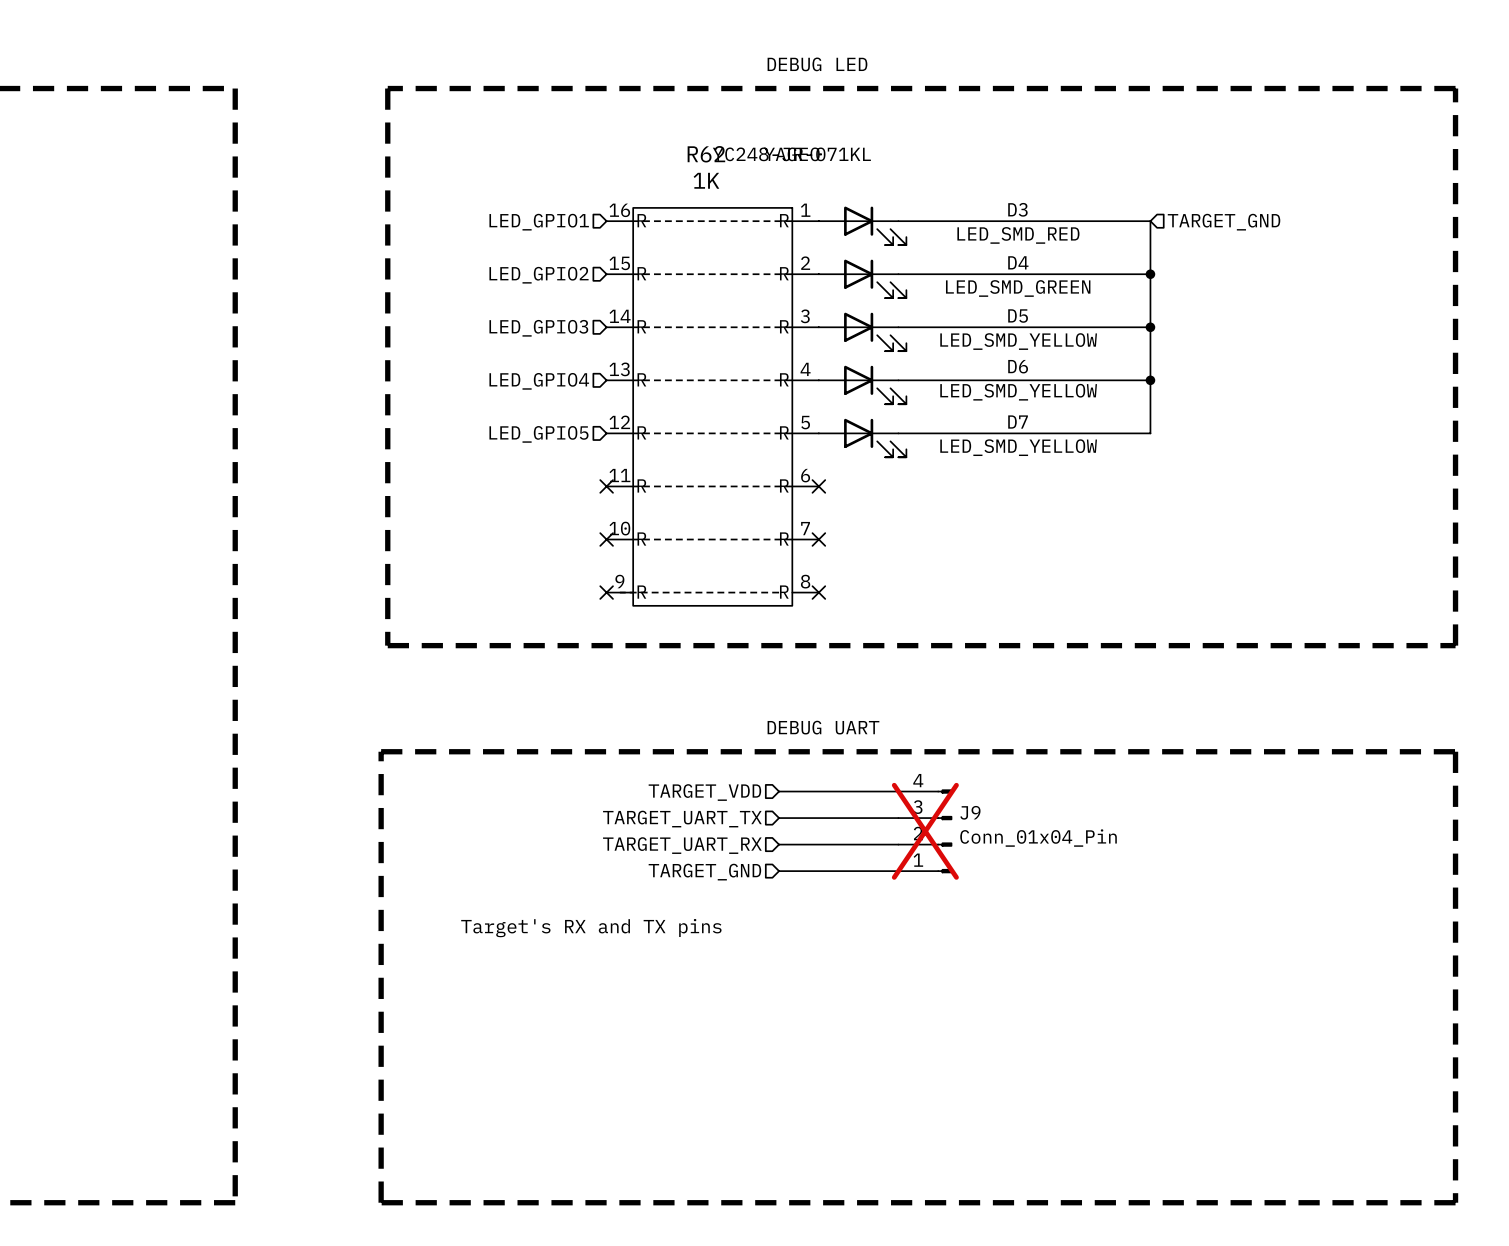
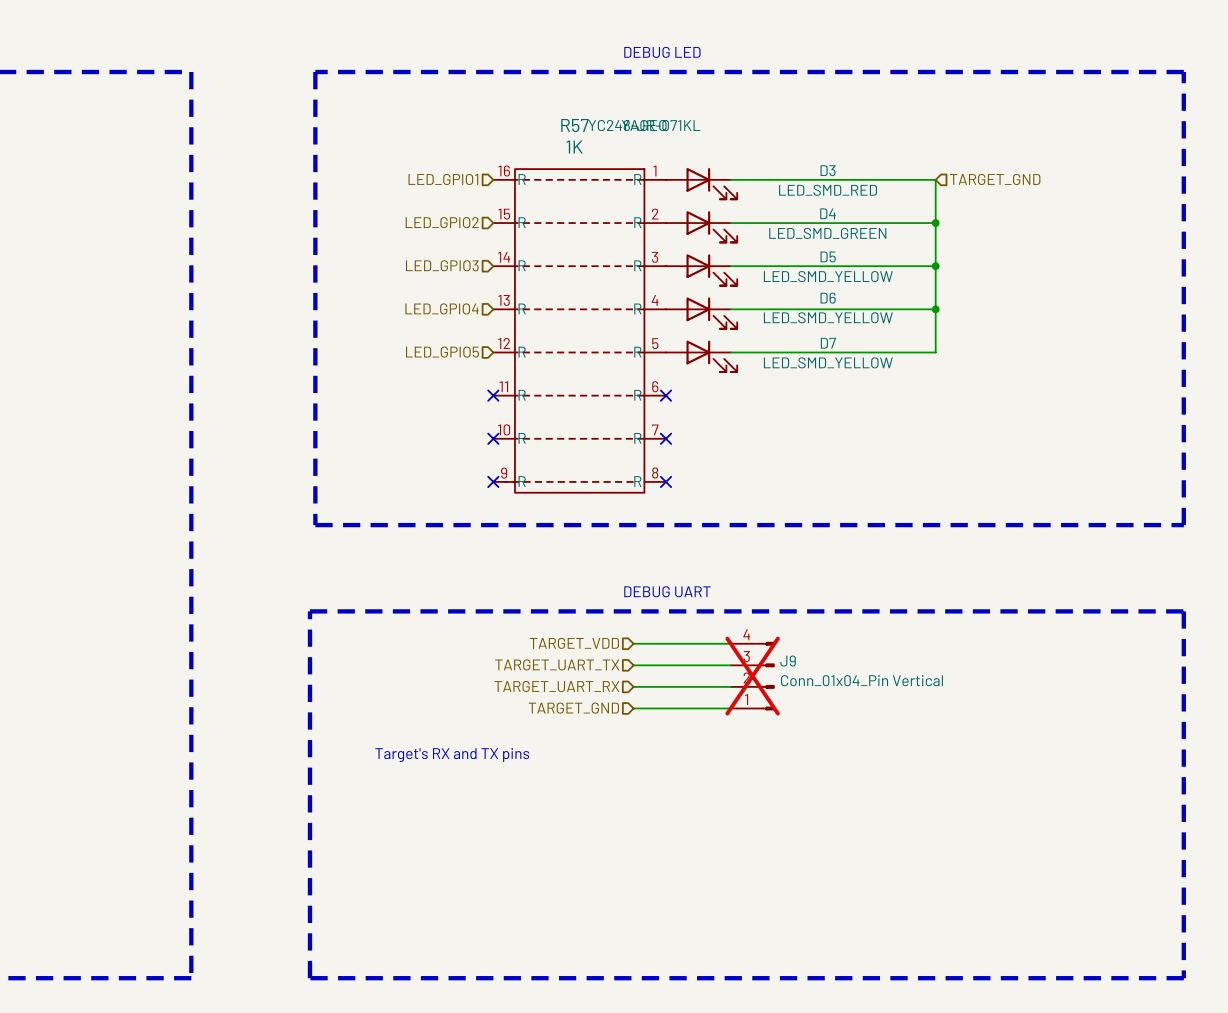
R62 name: R62 (706, 154) -> R57 (574, 125)
J9 value: Conn_01x04_Pin (1038, 838) -> Conn_01x04_Pin Vertical (861, 680)

